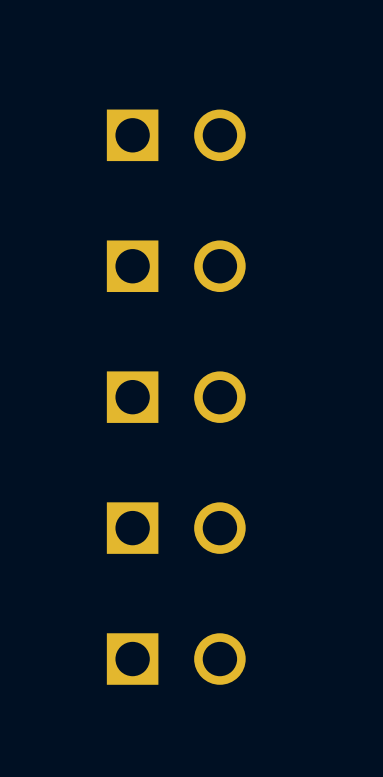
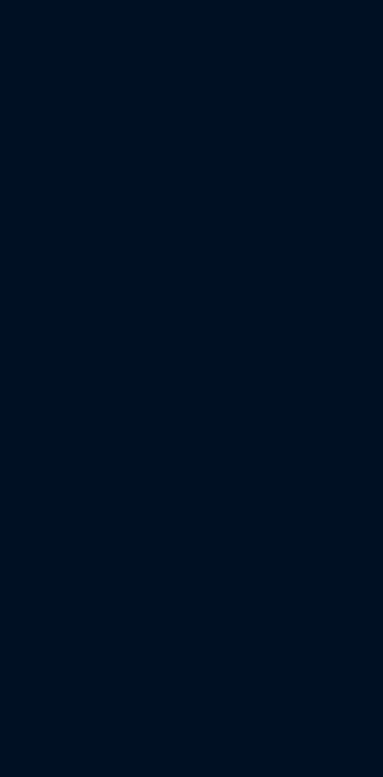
part: (176, 135) -> none
part: (176, 266) -> none
part: (176, 397) -> none
part: (176, 528) -> none
part: (176, 659) -> none

